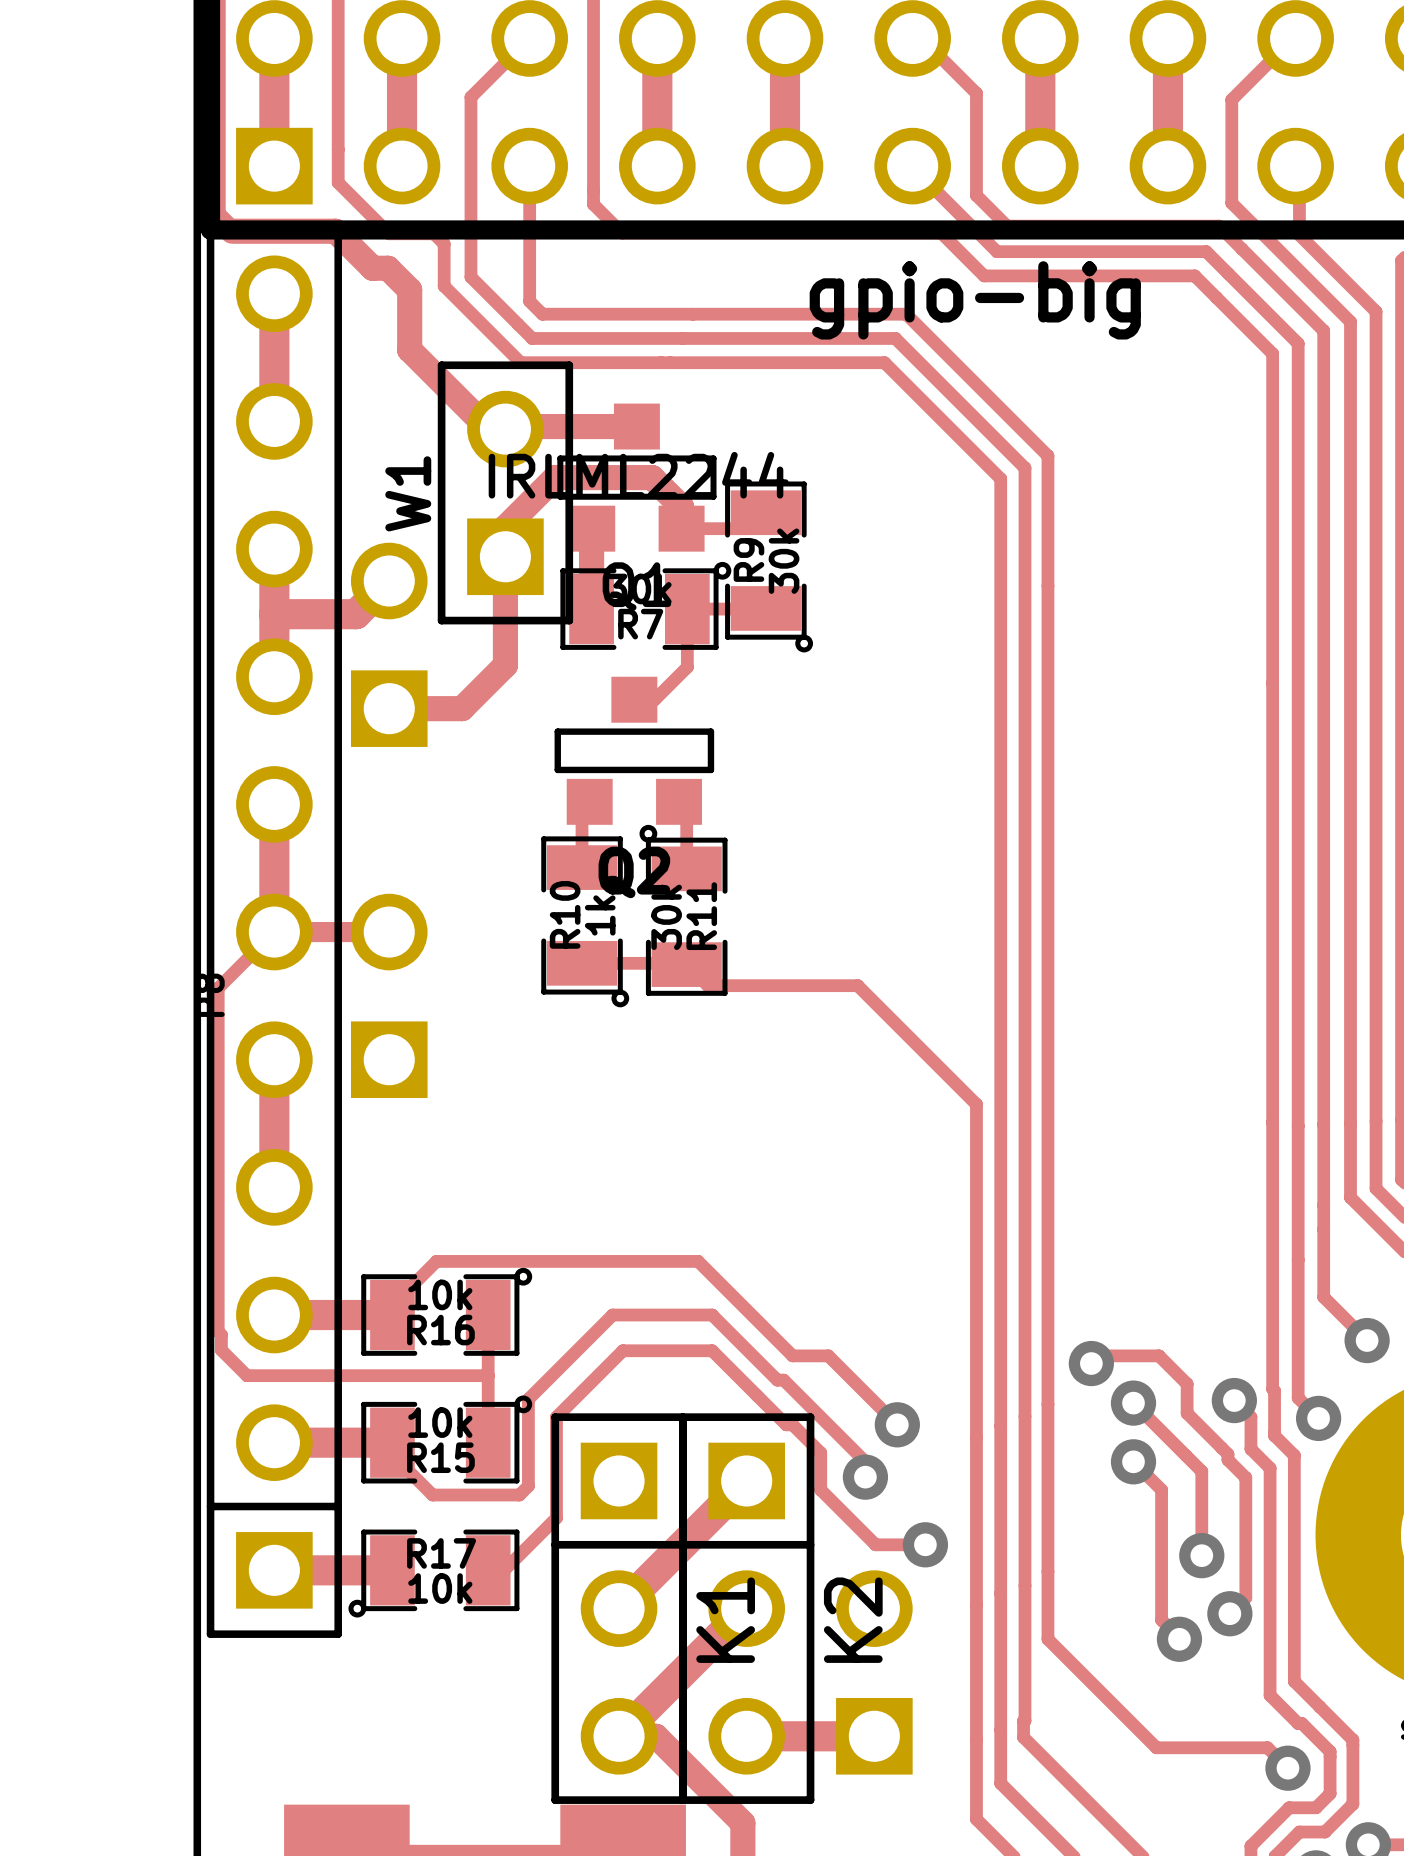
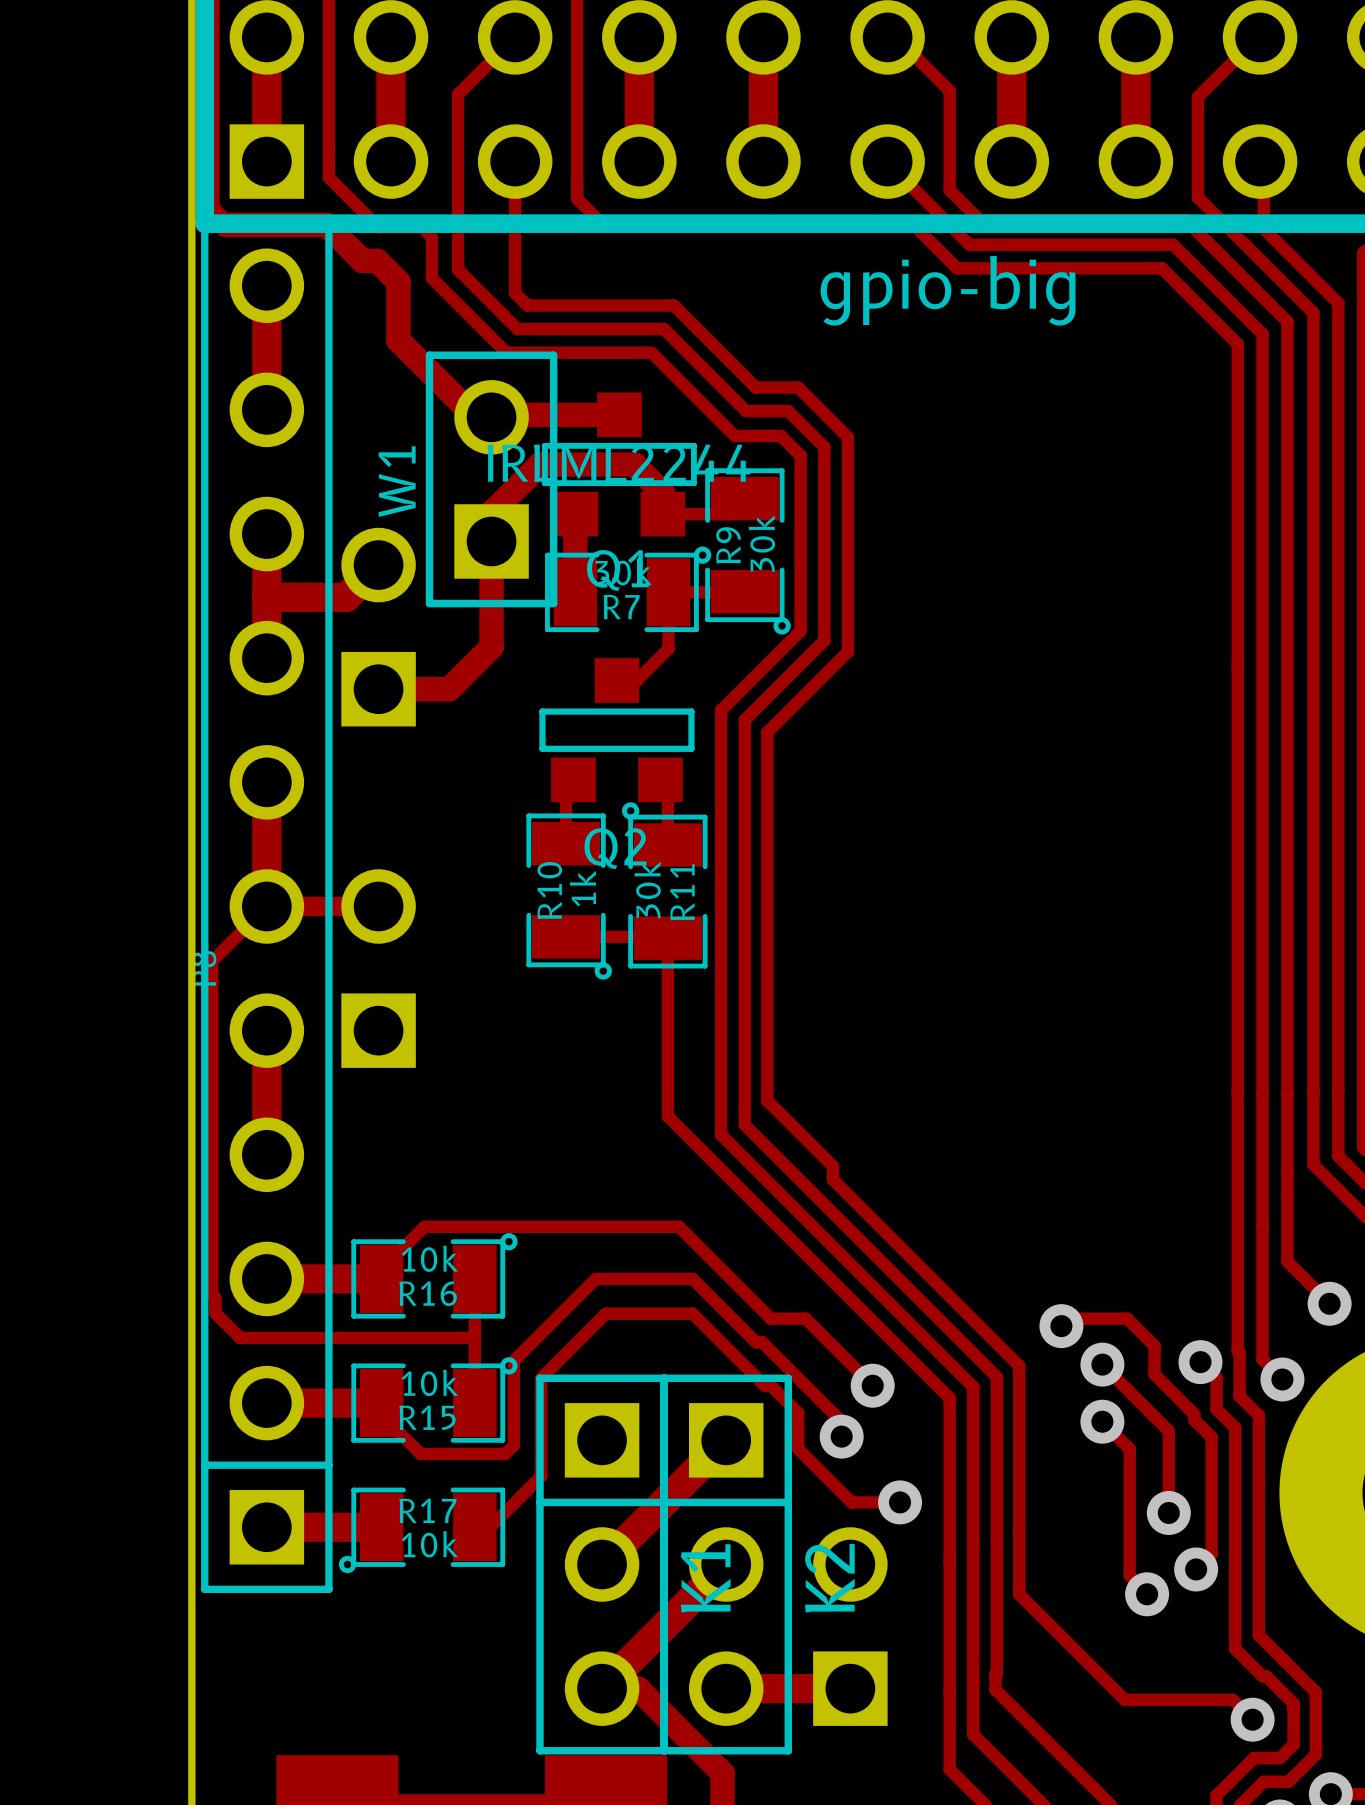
track: (692, 314) (906, 314) (1047, 455) (1047, 1404) -> (673, 305) (755, 387) (798, 387) (847, 437) (847, 651) (767, 732) (767, 1100) (832, 1166) (832, 1179) (1019, 1365)
track: (682, 338) (895, 338) (1024, 468) (1024, 1415) -> (664, 329) (746, 411) (788, 411) (824, 447) (824, 640) (744, 720) (744, 1125) (996, 1377)
track: (670, 362) (884, 362) (1000, 478) (1000, 1426) -> (651, 352) (734, 435) (780, 435) (800, 455) (800, 630) (721, 710) (721, 1134) (973, 1386)
track: (686, 964) (707, 985) (857, 985) (976, 1104) (976, 1437) -> (667, 938) (667, 1116) (949, 1398)

